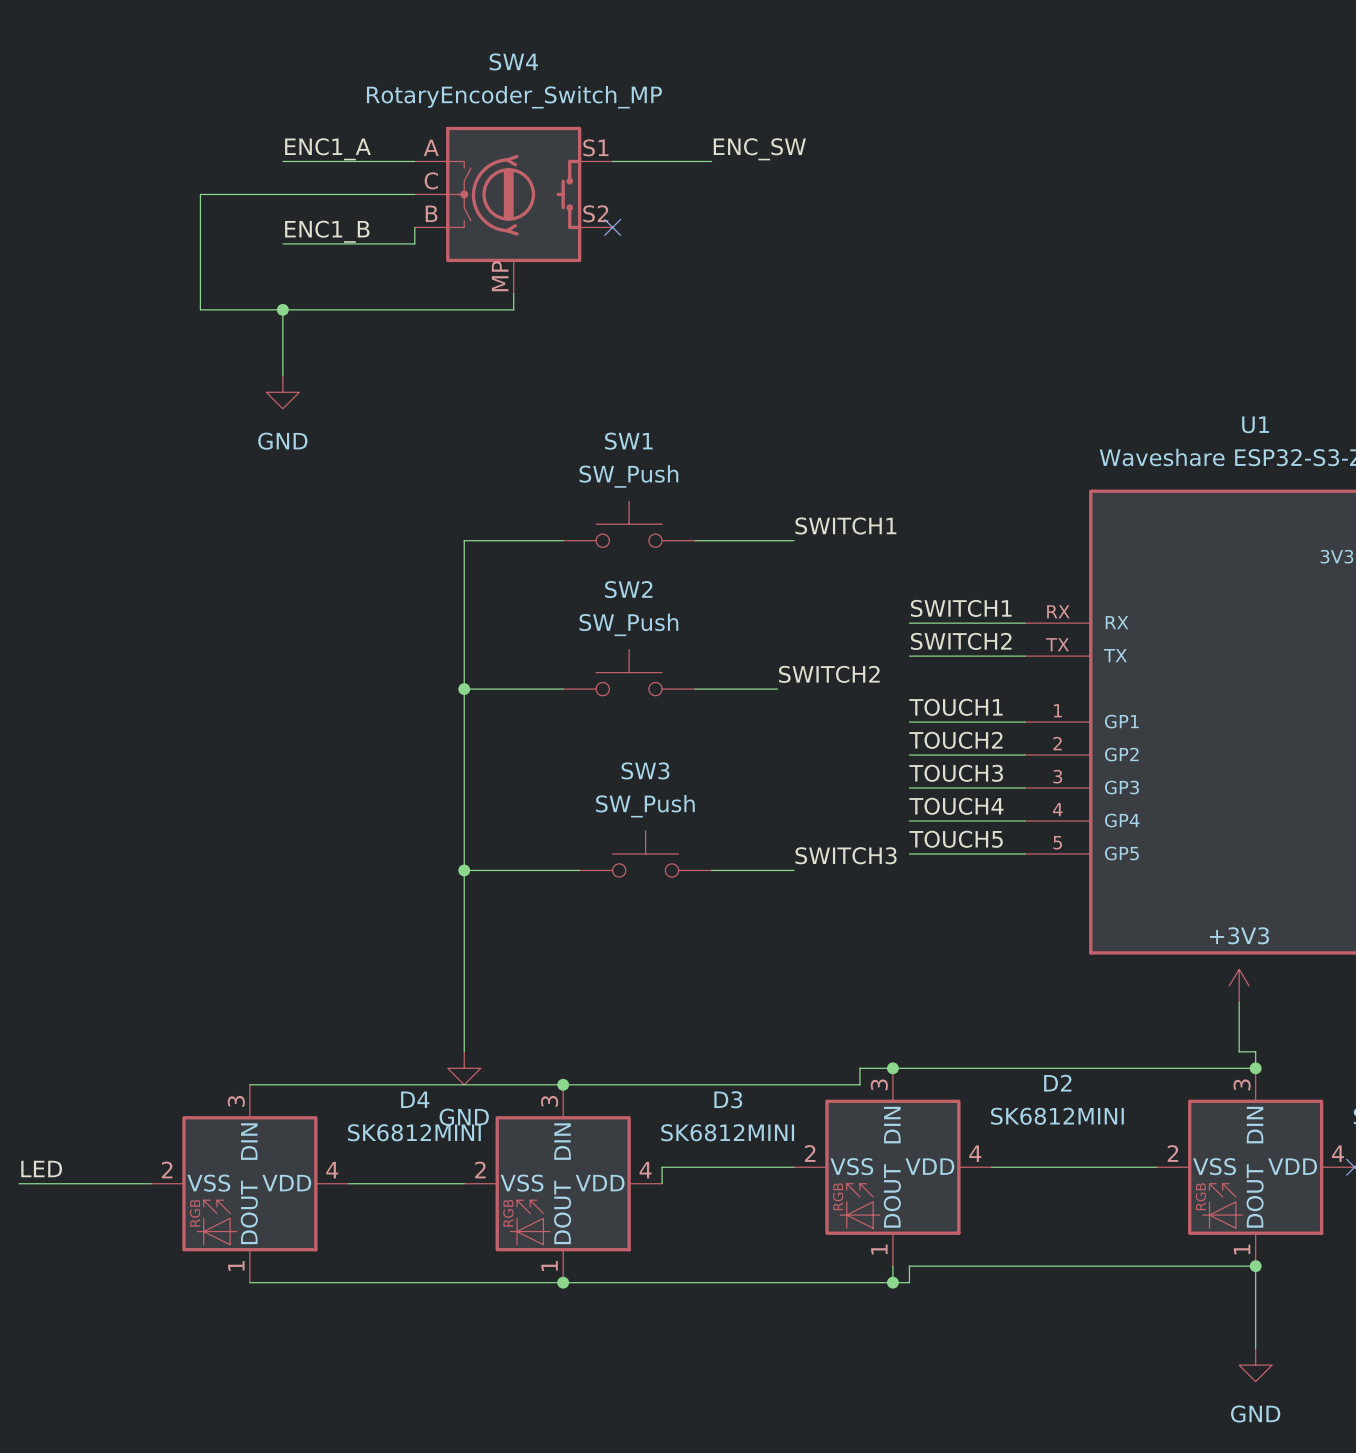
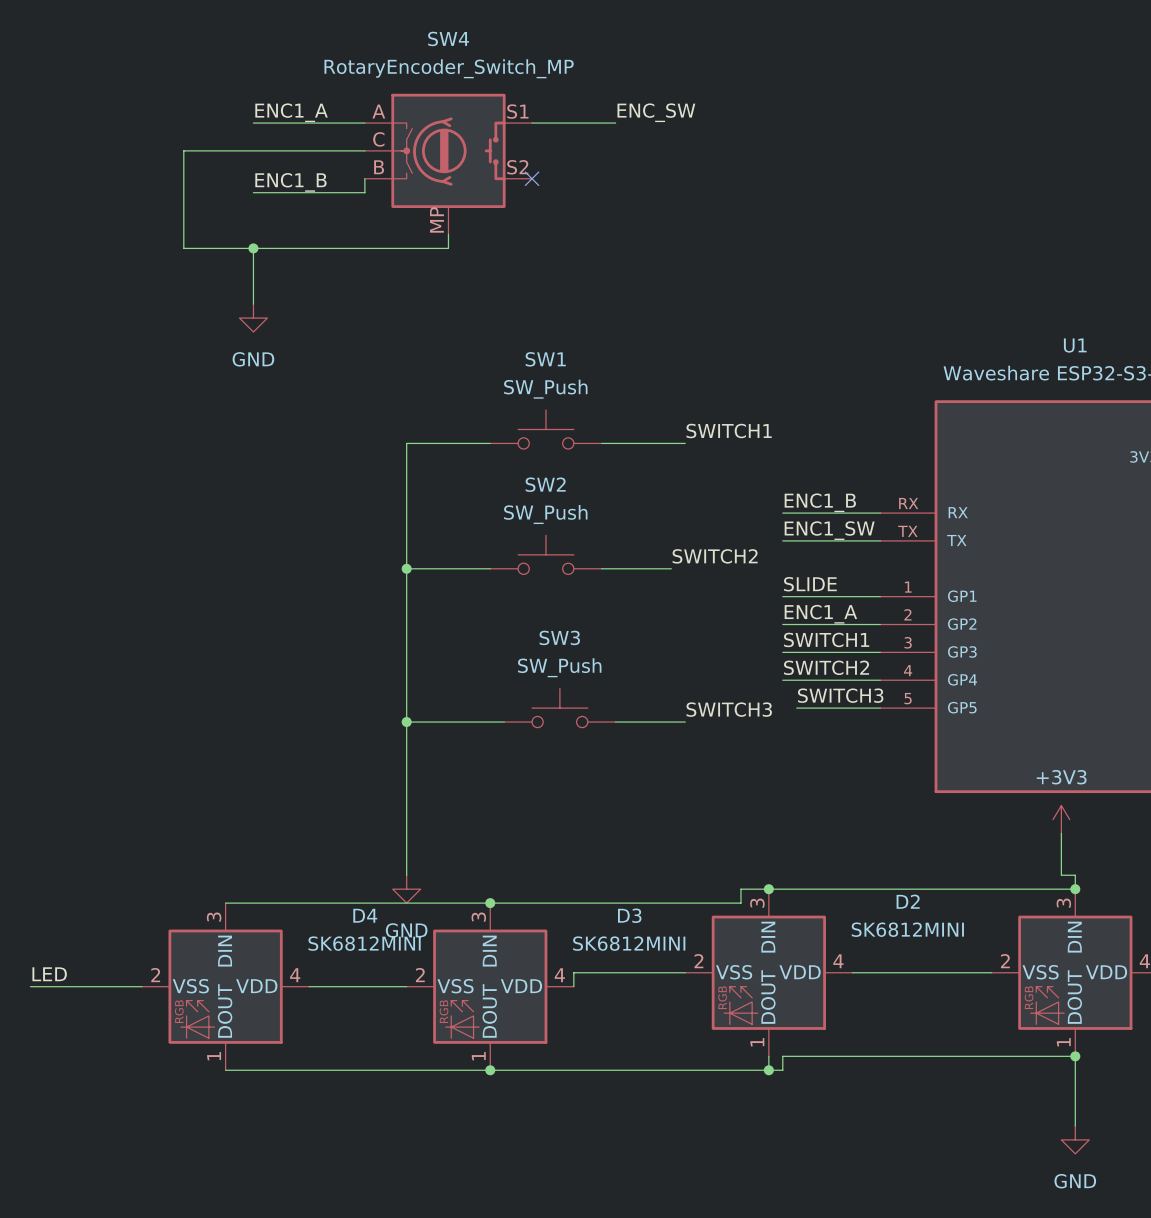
label: SWITCH1 (961, 608) -> ENC1_B (820, 502)
label: SWITCH2 (961, 641) -> ENC1_SW (829, 530)
label: TOUCH1 (956, 707) -> SLIDE (810, 584)
label: TOUCH2 (955, 740) -> ENC1_A (820, 614)
label: TOUCH3 (956, 773) -> SWITCH1 (826, 639)
label: TOUCH4 (956, 806) -> SWITCH2 (826, 667)
label: TOUCH5 (956, 839) -> none
label: none -> SWITCH3 (840, 695)
wire: (909, 853) (925, 853) -> none

